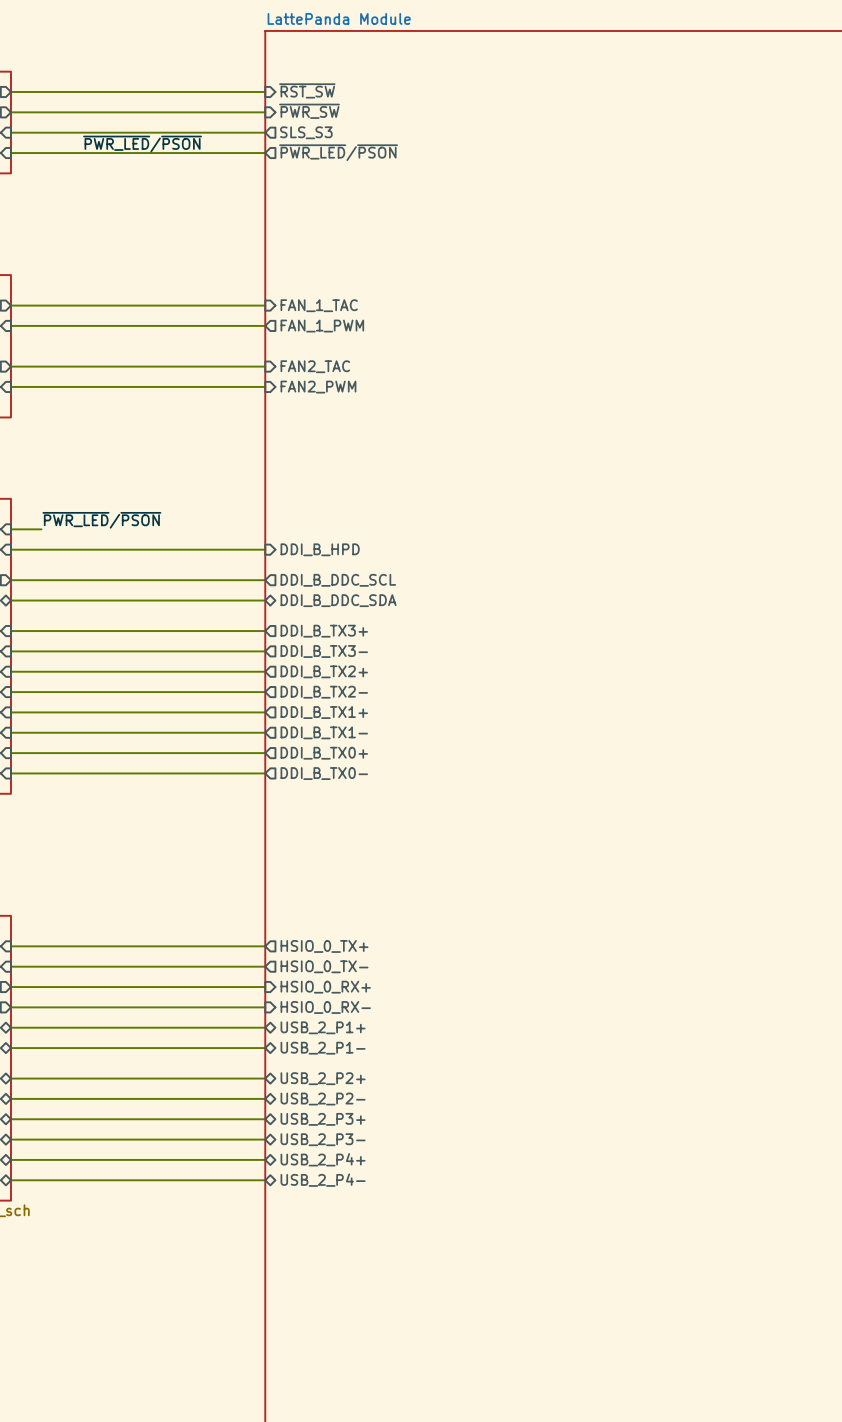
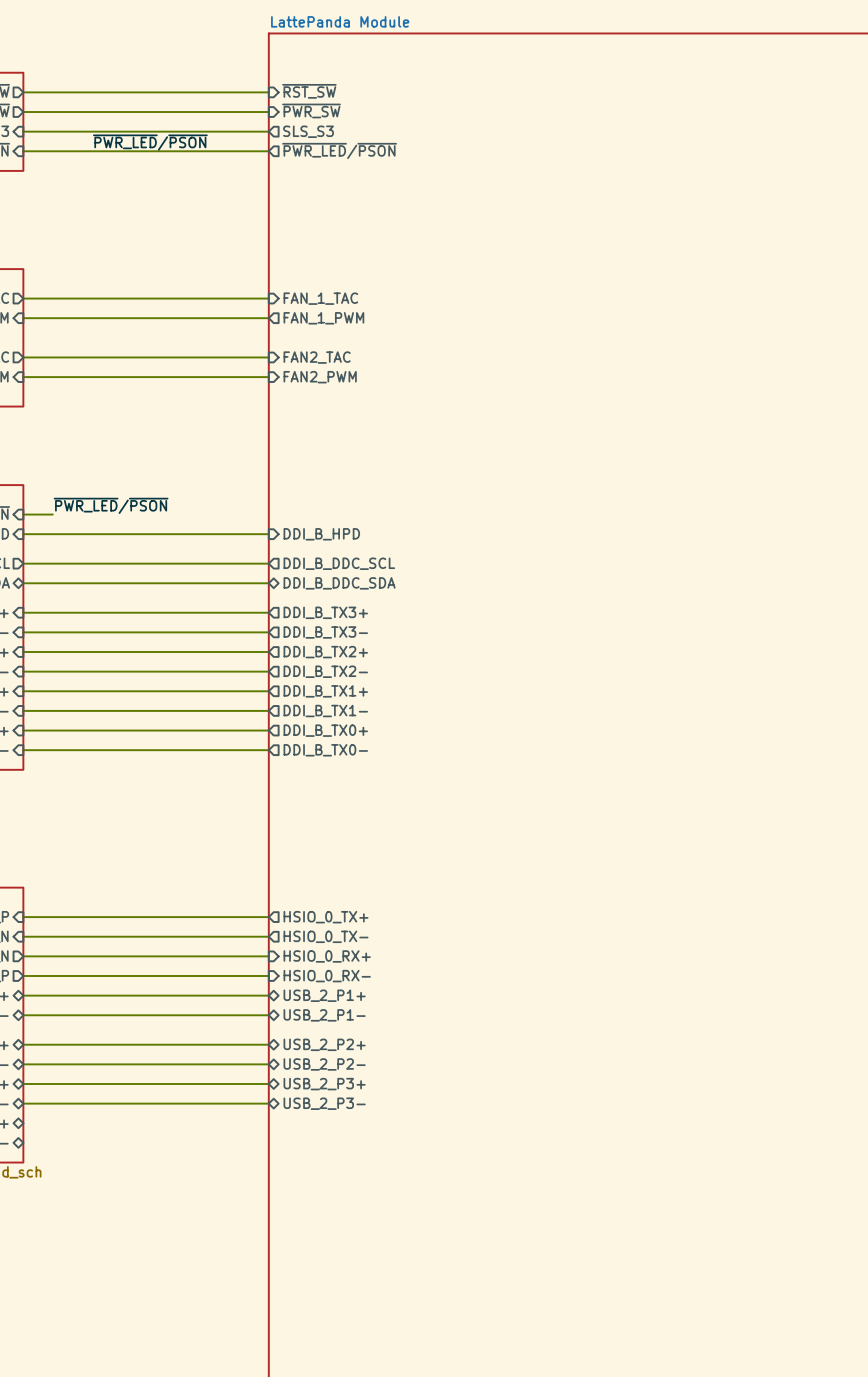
wire: (10, 1159) (265, 1159) -> none
sheet pin: USB_2_P4+ (323, 1159) -> none
wire: (10, 1180) (265, 1180) -> none
sheet pin: USB_2_P4- (323, 1180) -> none

